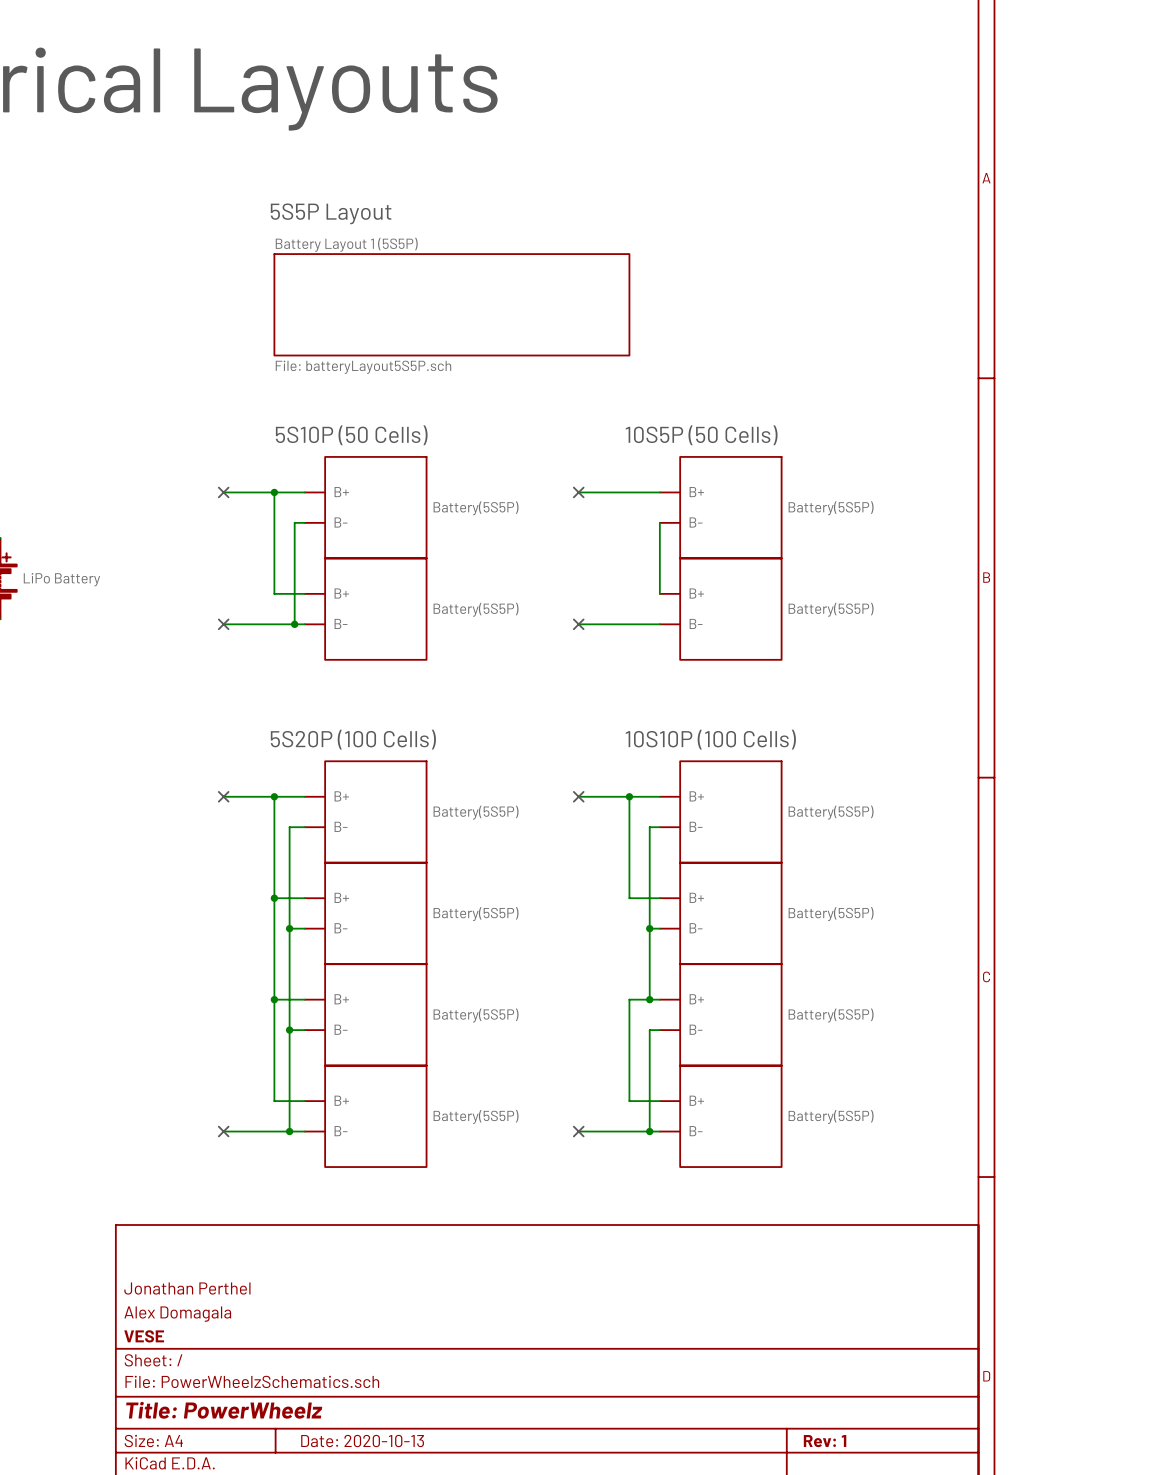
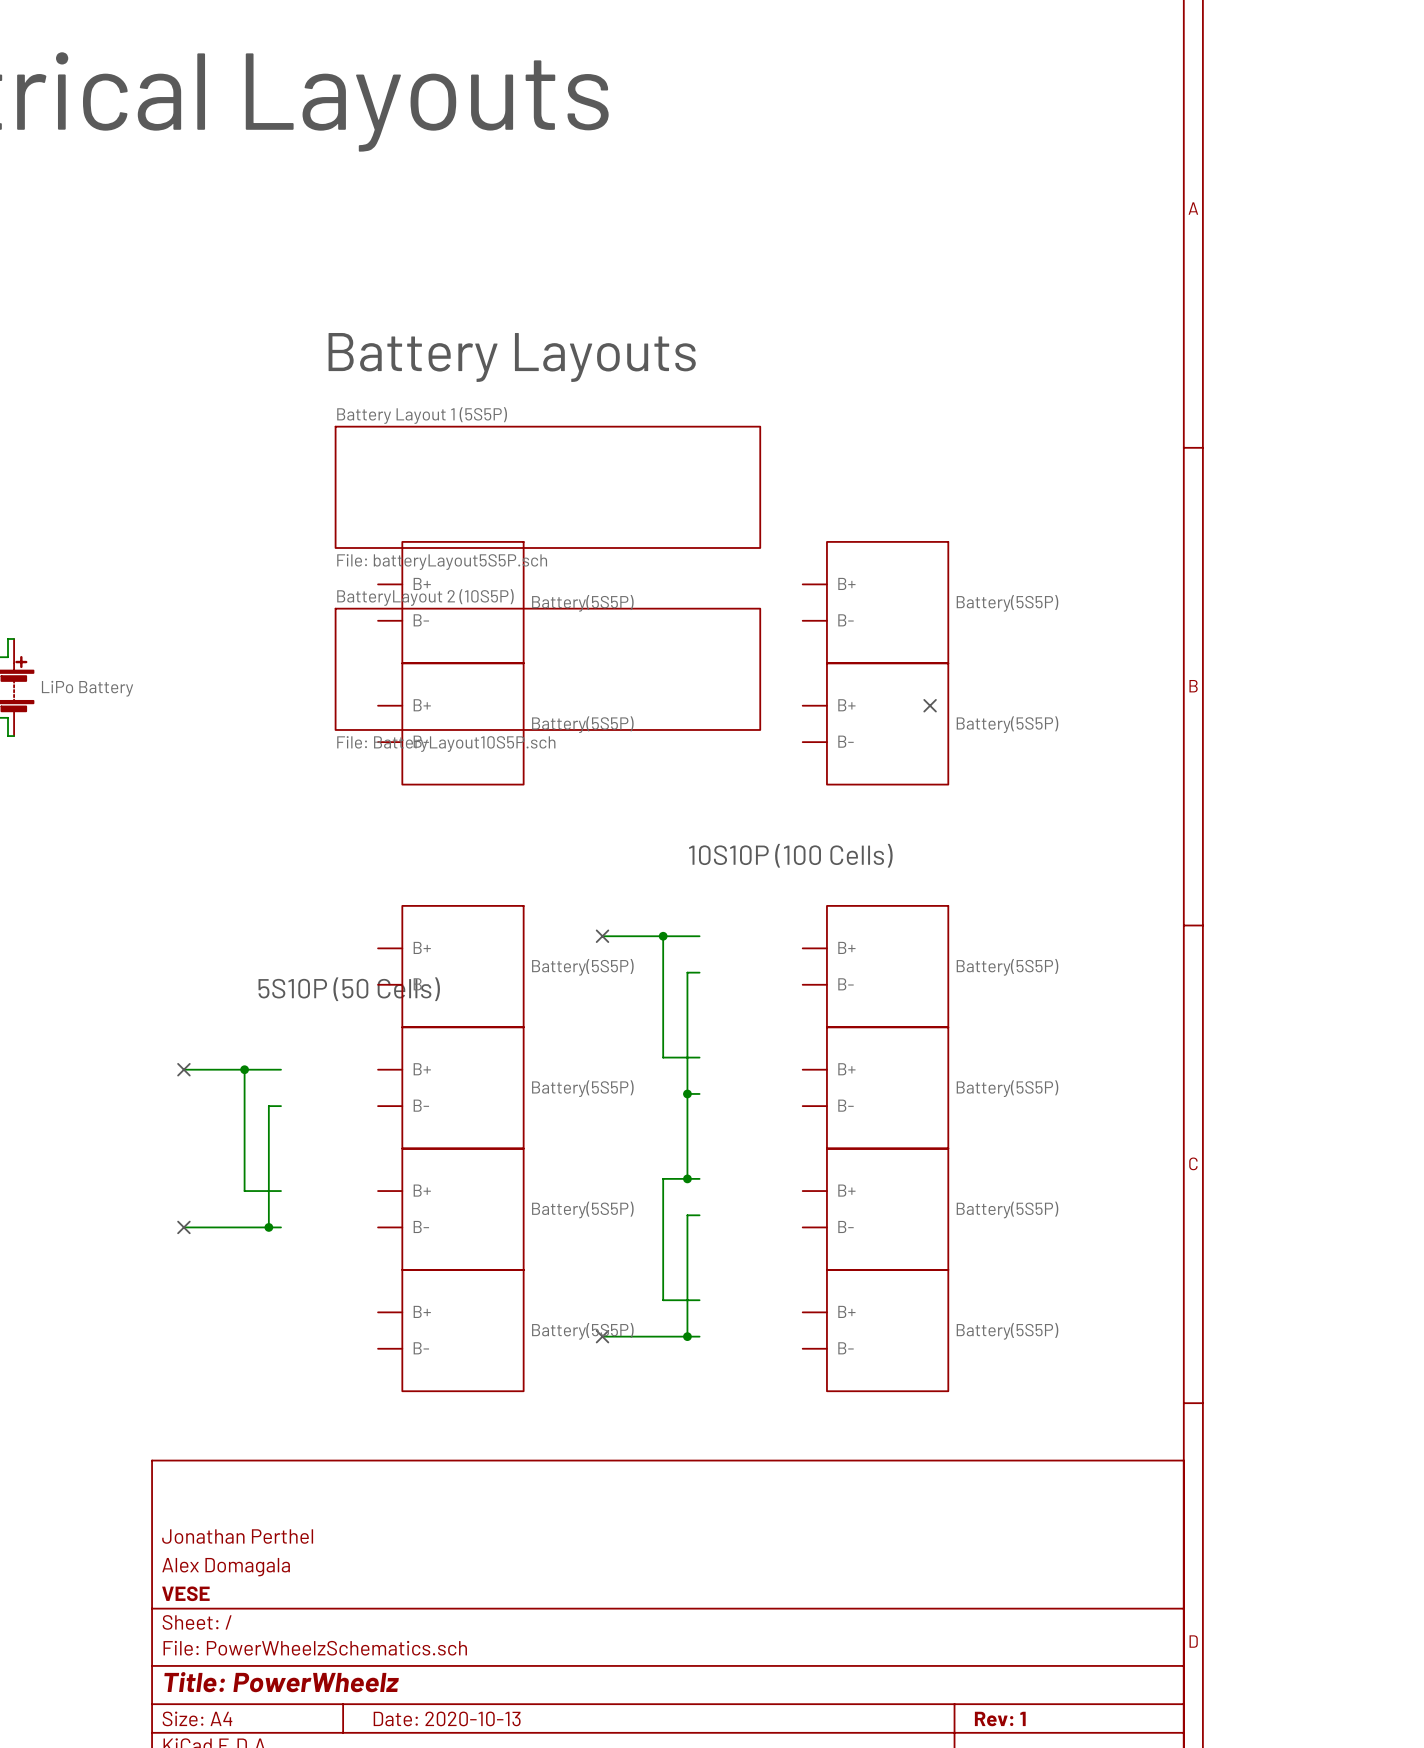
text: 5S5P Layout (331, 213) -> none
text: none -> Battery Layouts (512, 357)
sheet Battery Layout 1 (5S5P) position: (451, 304) -> (547, 487)
text: 5S10P (50 Cells) (351, 435) -> none
text: 10S5P (50 Cells) (701, 435) -> none
wire: (223, 492) (304, 492) -> none
no-connect mark: (223, 492) -> none
wire: (274, 492) (274, 593) (304, 593) -> none
junction: (274, 492) -> none
wire: (578, 492) (659, 492) -> none
no-connect mark: (578, 492) -> none
wire: (304, 522) (294, 522) (294, 624) -> none
wire: (659, 522) (659, 593) -> none
sheet BatteryLayout 2 (10S5P): none -> File: BatteryLayout10S5P.sch (547, 669)
no-connect mark: none -> (930, 705)
wire: (223, 624) (304, 624) -> none
no-connect mark: (223, 624) -> none
junction: (294, 624) -> none
wire: (578, 624) (659, 624) -> none
no-connect mark: (578, 624) -> none
text: 5S20P (100 Cells) (353, 739) -> none
text position: 10S10P (100 Cells) (710, 739) -> 10S10P (100 Cells) (790, 855)
no-connect mark: none -> (602, 936)
junction: none -> (663, 936)
wire: (223, 796) (304, 796) -> (183, 1069) (280, 1069)
no-connect mark: (223, 796) -> none
wire: (274, 796) (274, 1101) (304, 1101) -> none
junction: (274, 796) -> none
wire: (578, 796) (659, 796) -> (602, 936) (699, 936)
no-connect mark: (578, 796) -> none
wire: (629, 796) (629, 898) (659, 898) -> (663, 936) (663, 1057) (699, 1057)
junction: (629, 796) -> none
wire: (304, 827) (289, 827) (289, 1131) -> none
wire: (659, 827) (649, 827) (649, 999) -> (699, 972) (687, 972) (687, 1178)
text: none -> 5S10P (50 Cells) (349, 989)
no-connect mark: none -> (183, 1069)
wire: none -> (244, 1069) (244, 1191) (280, 1191)
junction: none -> (244, 1069)
wire: (274, 898) (304, 898) -> none
junction: (274, 898) -> none
junction: none -> (687, 1093)
wire: none -> (280, 1106) (268, 1106) (268, 1227)
wire: (289, 928) (304, 928) -> none
junction: (289, 928) -> none
wire: (649, 928) (659, 928) -> (687, 1093) (699, 1093)
junction: (649, 928) -> none
junction: none -> (687, 1178)
wire: (274, 999) (304, 999) -> none
junction: (274, 999) -> none
junction: (649, 999) -> none
wire: (659, 999) (629, 999) (629, 1101) (659, 1101) -> (699, 1178) (663, 1178) (663, 1300) (699, 1300)
no-connect mark: none -> (183, 1227)
junction: none -> (268, 1227)
wire: (289, 1030) (304, 1030) -> none
junction: (289, 1030) -> none
wire: (659, 1030) (649, 1030) (649, 1131) -> (699, 1215) (687, 1215) (687, 1336)
no-connect mark: none -> (602, 1336)
junction: none -> (687, 1336)
wire: (223, 1131) (304, 1131) -> (183, 1227) (280, 1227)
no-connect mark: (223, 1131) -> none
junction: (289, 1131) -> none
wire: (578, 1131) (659, 1131) -> (602, 1336) (699, 1336)
no-connect mark: (578, 1131) -> none
junction: (649, 1131) -> none

